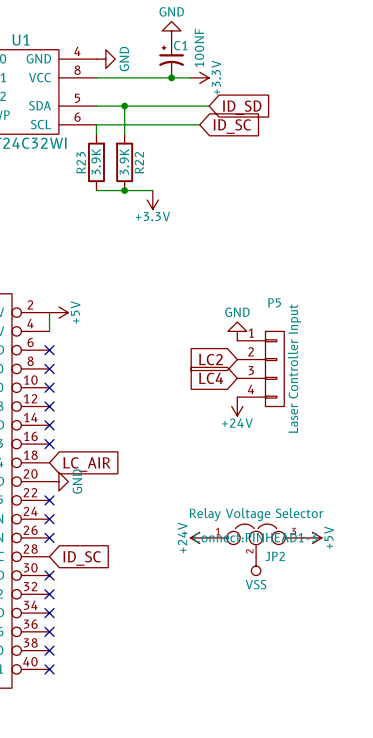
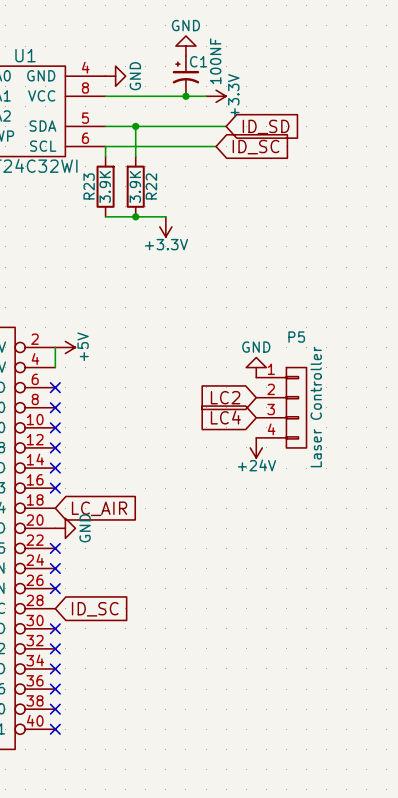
P5 value: Laser Controller Input (294, 368) -> Laser Controller (316, 407)
power symbol: +24V (199, 537) -> none
power symbol: +5V (312, 537) -> none
JP2: Relay Voltage Selector (256, 540) -> none
power symbol: VSS (256, 566) -> none

